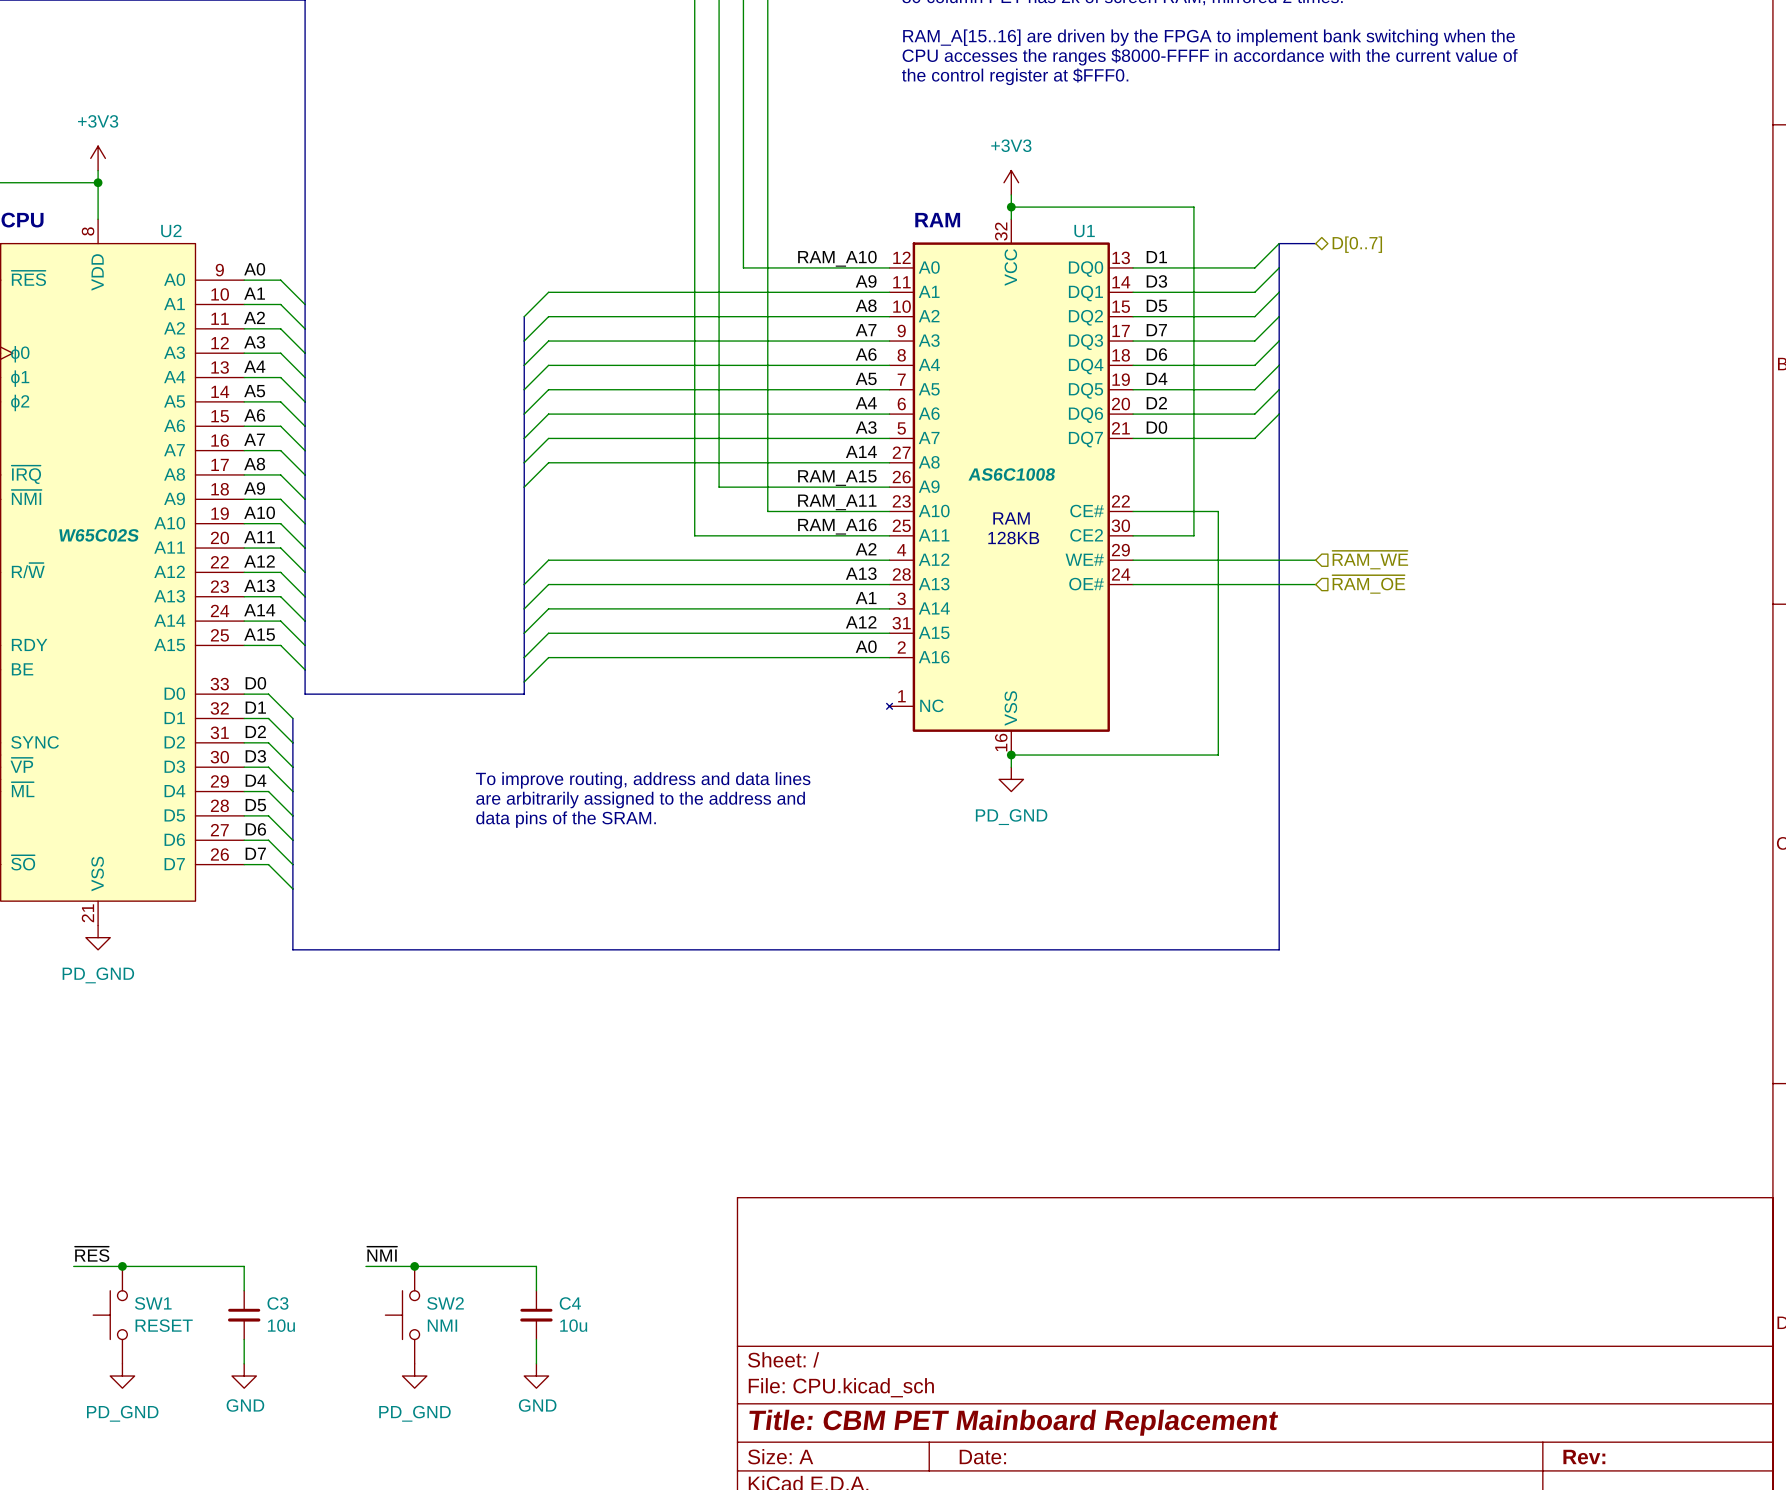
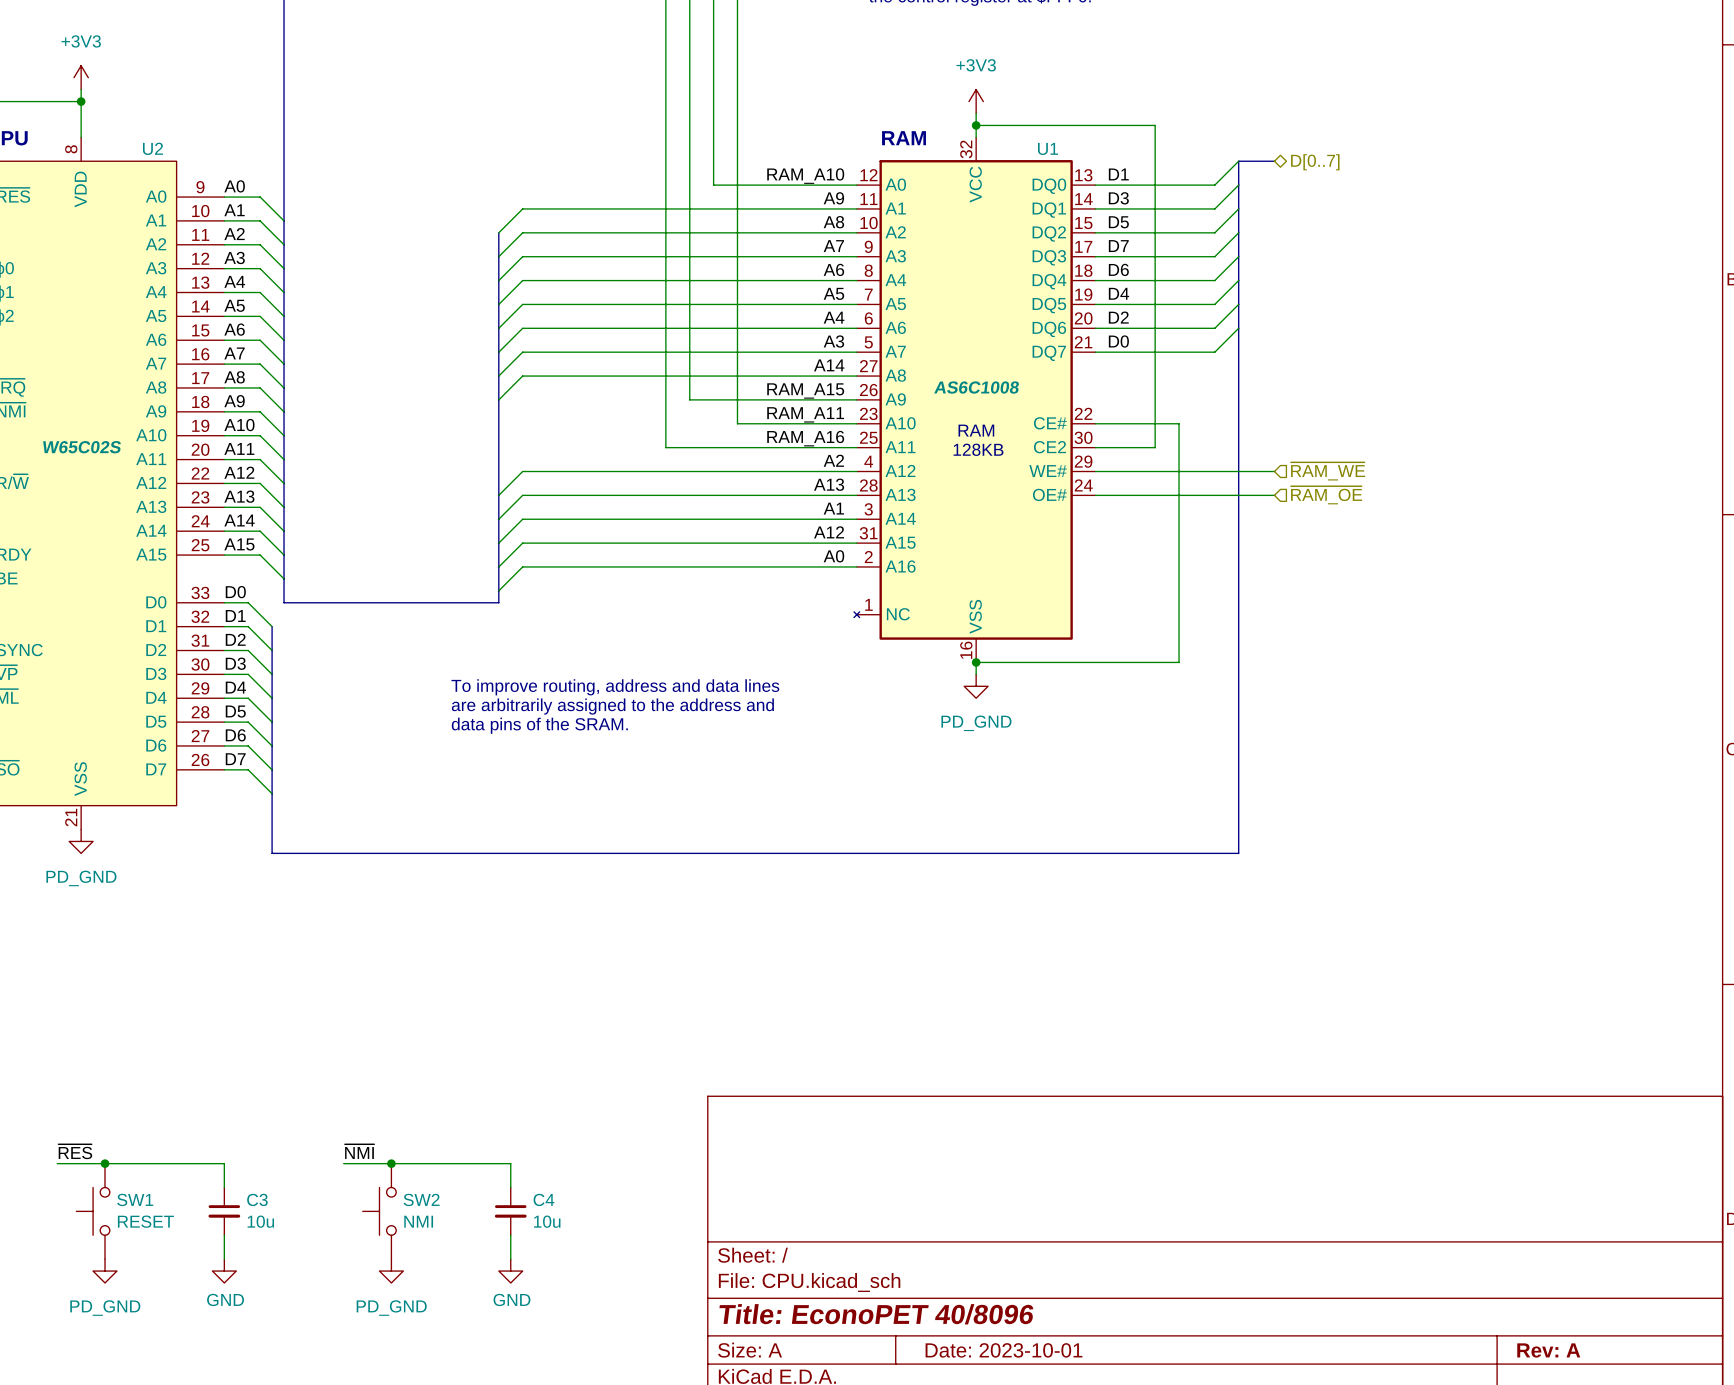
title block: Title: CBM PET Mainboard Replacement (1013, 1422) -> Title: EconoPET 40/8096 (876, 1314)
title block: Date: (982, 1457) -> Date: 2023-10-01 (1003, 1350)
title block: Rev: (1584, 1457) -> Rev: A (1548, 1350)

